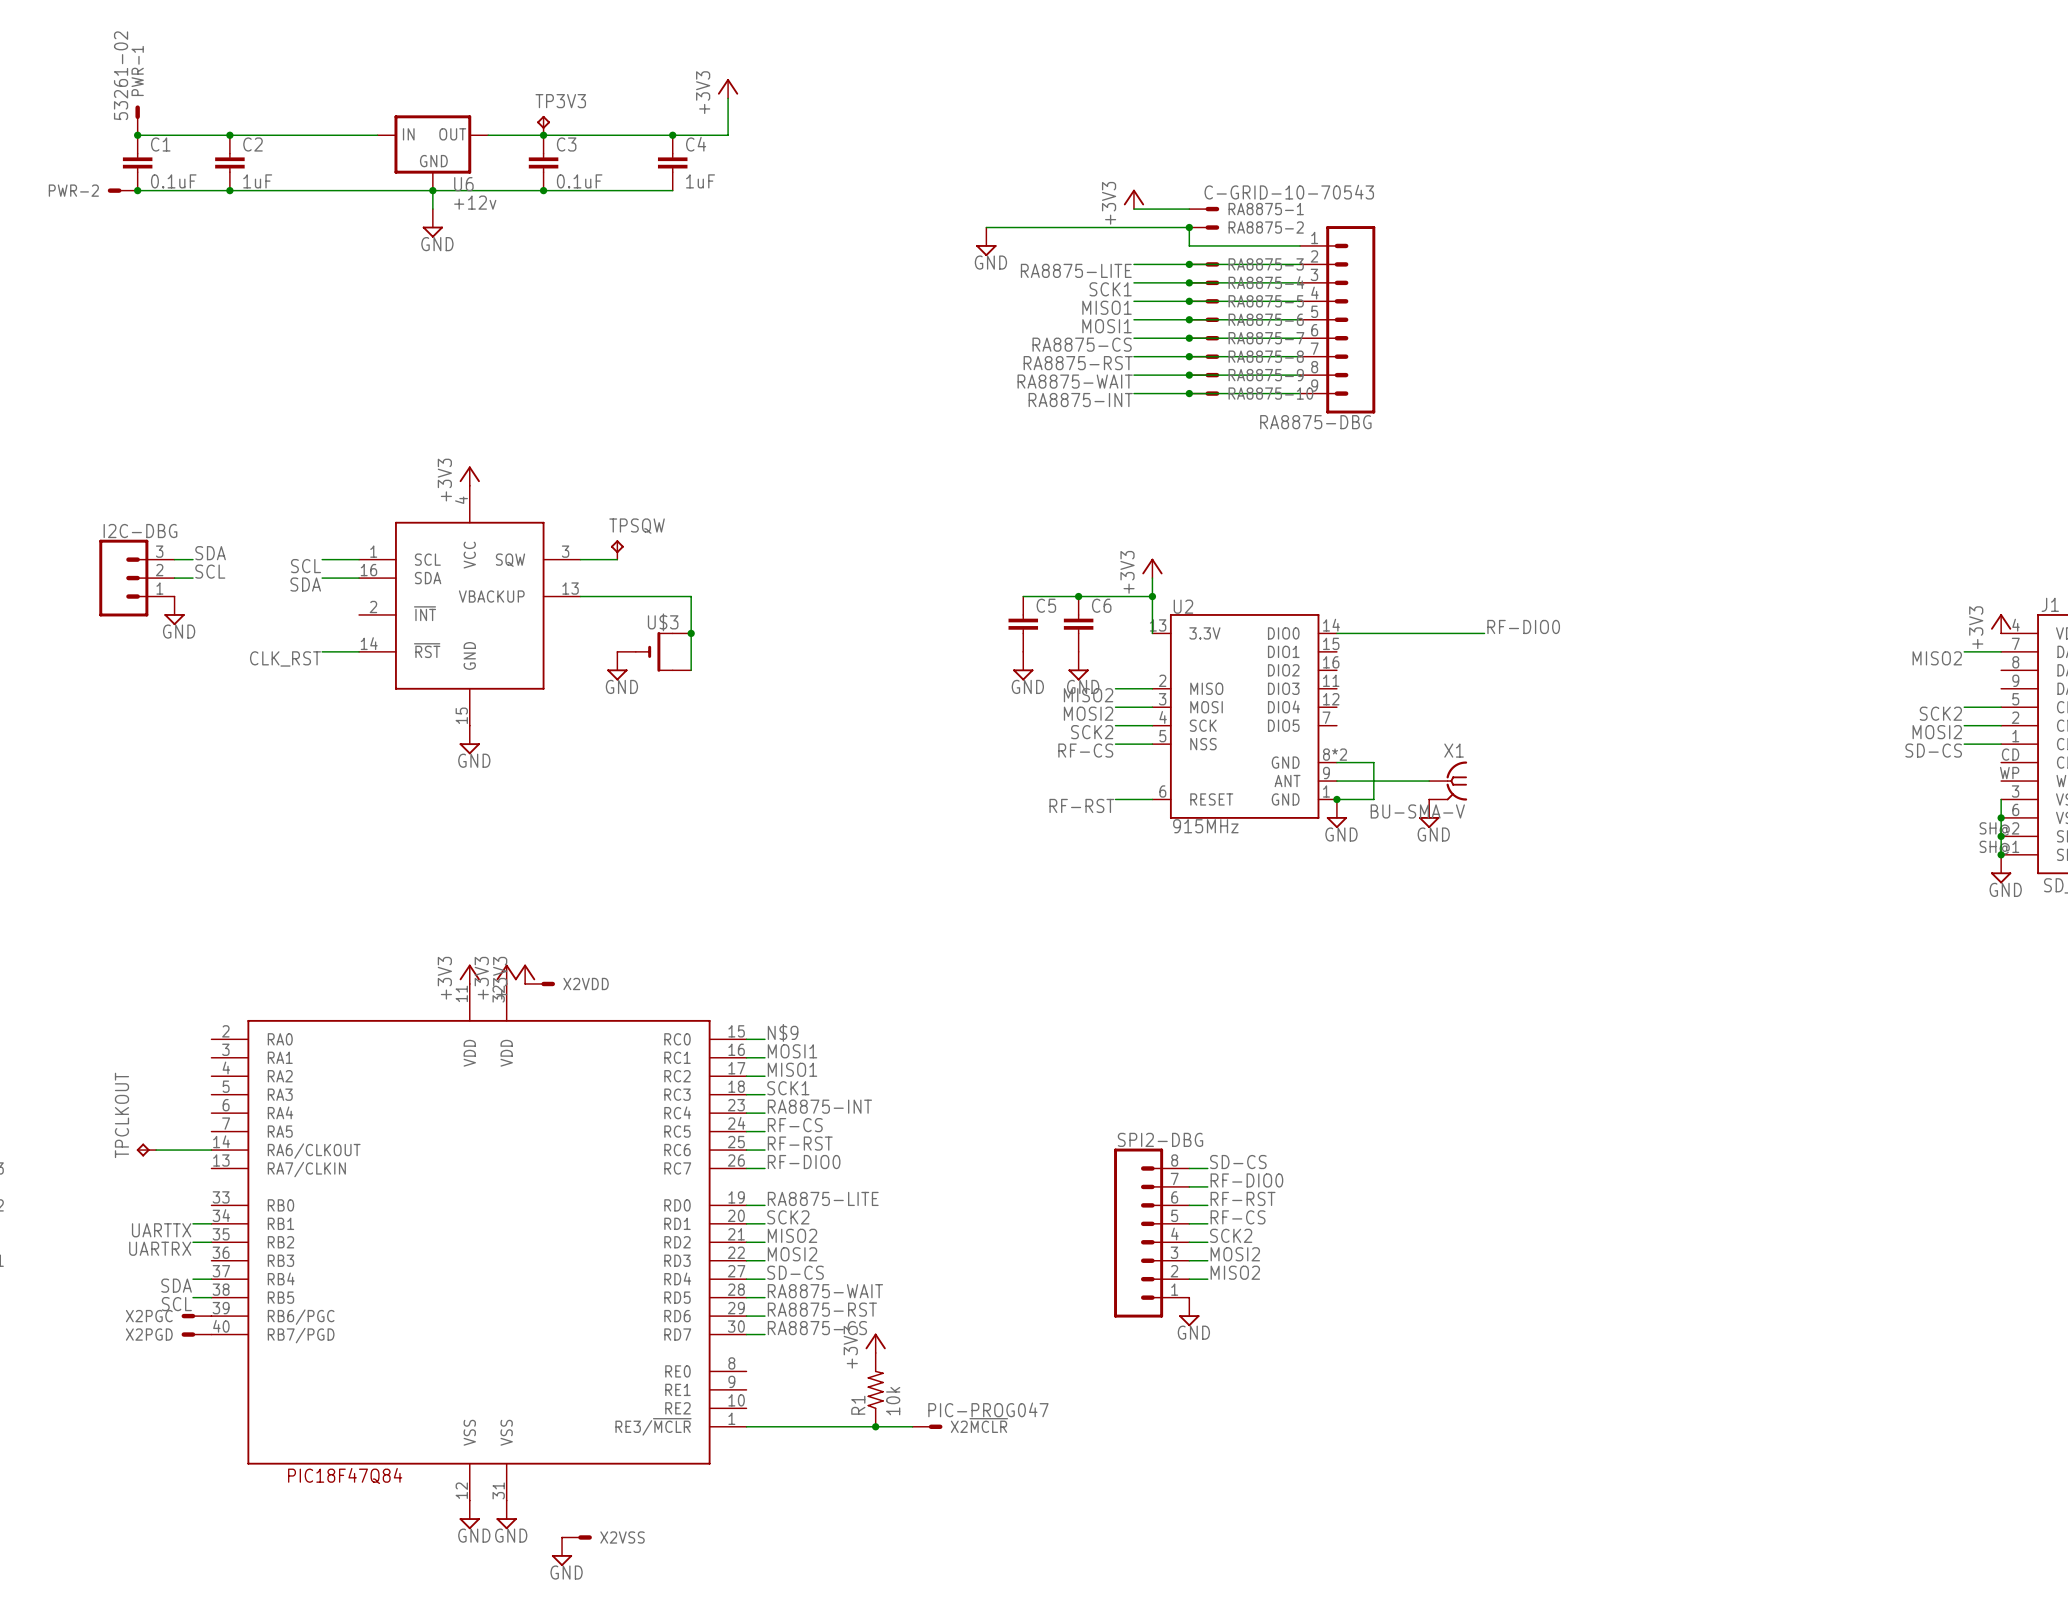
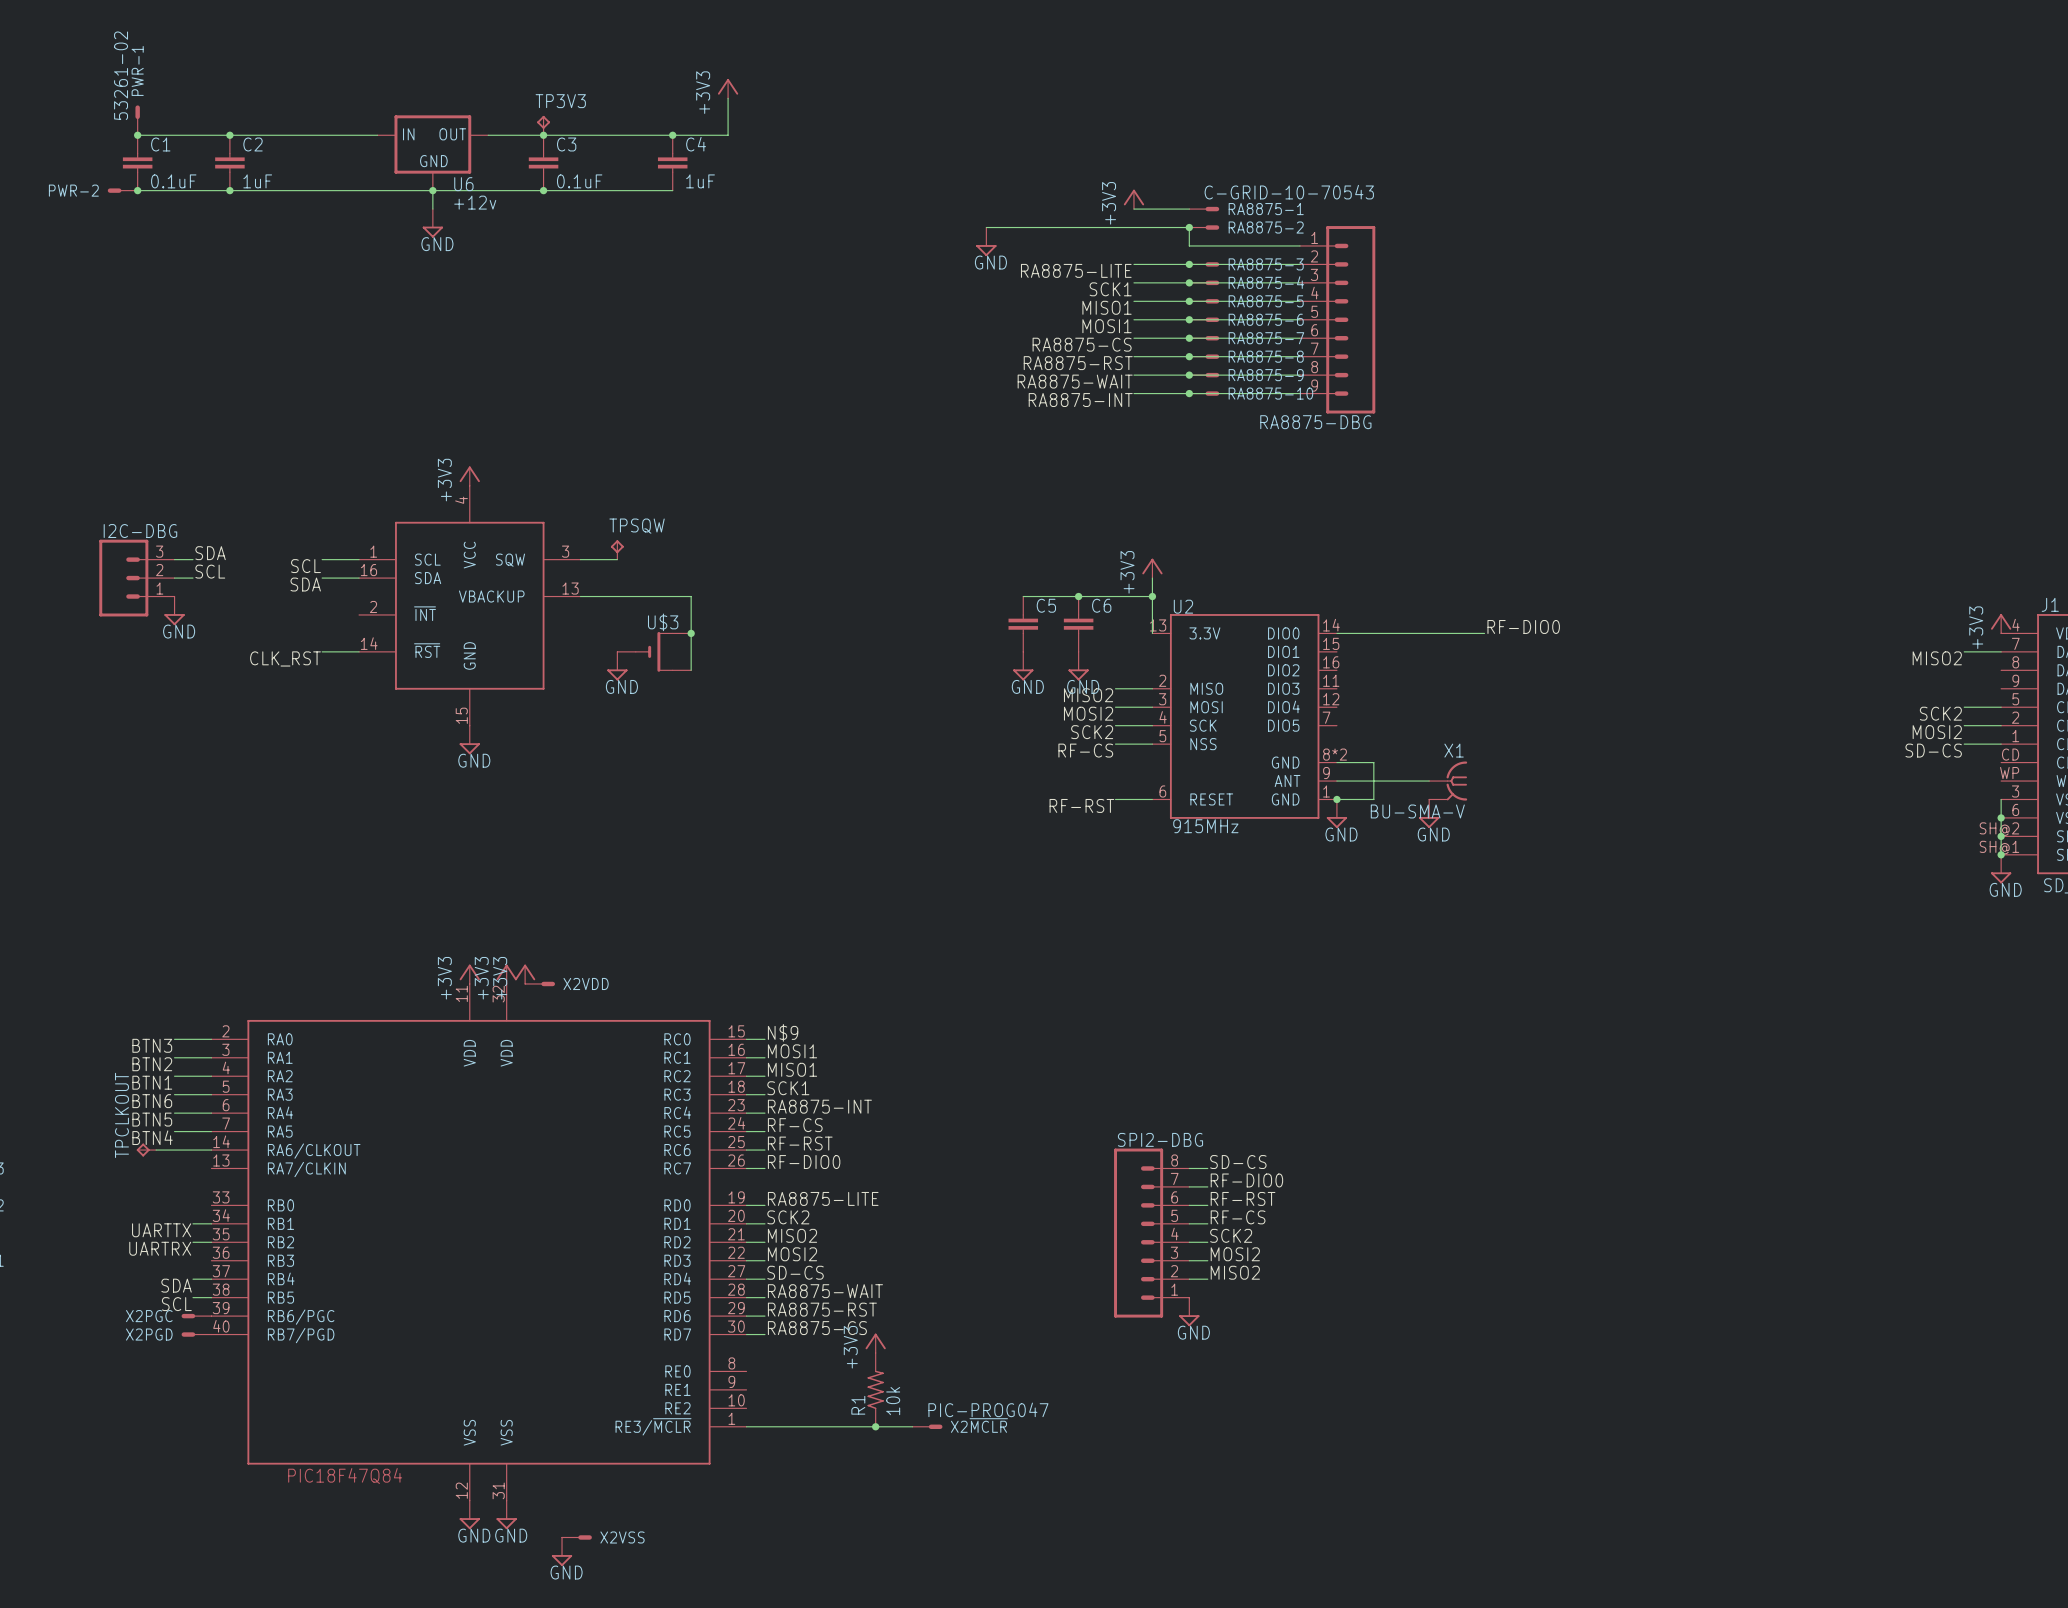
wire: none -> (174, 1039) (211, 1039)
label: none -> BTN3 (152, 1045)
wire: none -> (174, 1057) (211, 1057)
label: none -> BTN2 (152, 1064)
wire: none -> (174, 1076) (211, 1076)
label: none -> BTN1 (152, 1082)
wire: none -> (174, 1094) (211, 1094)
label: none -> BTN6 (152, 1101)
wire: none -> (174, 1113) (211, 1113)
label: none -> BTN5 (152, 1119)
wire: none -> (174, 1131) (211, 1131)
label: none -> BTN4 (152, 1137)

